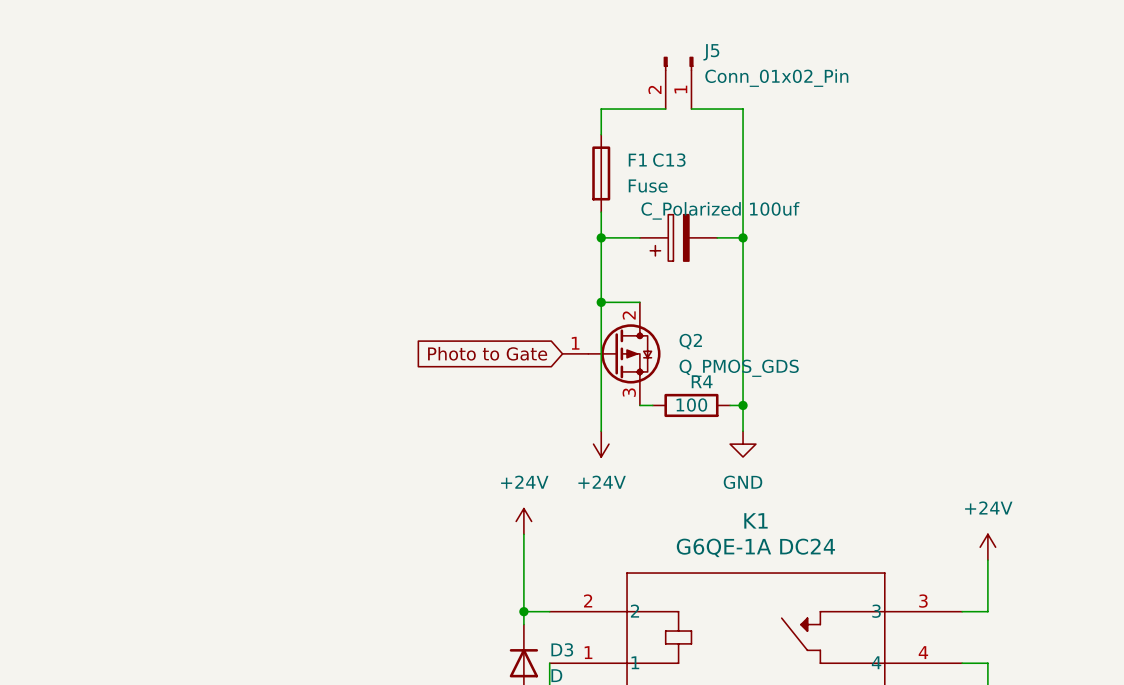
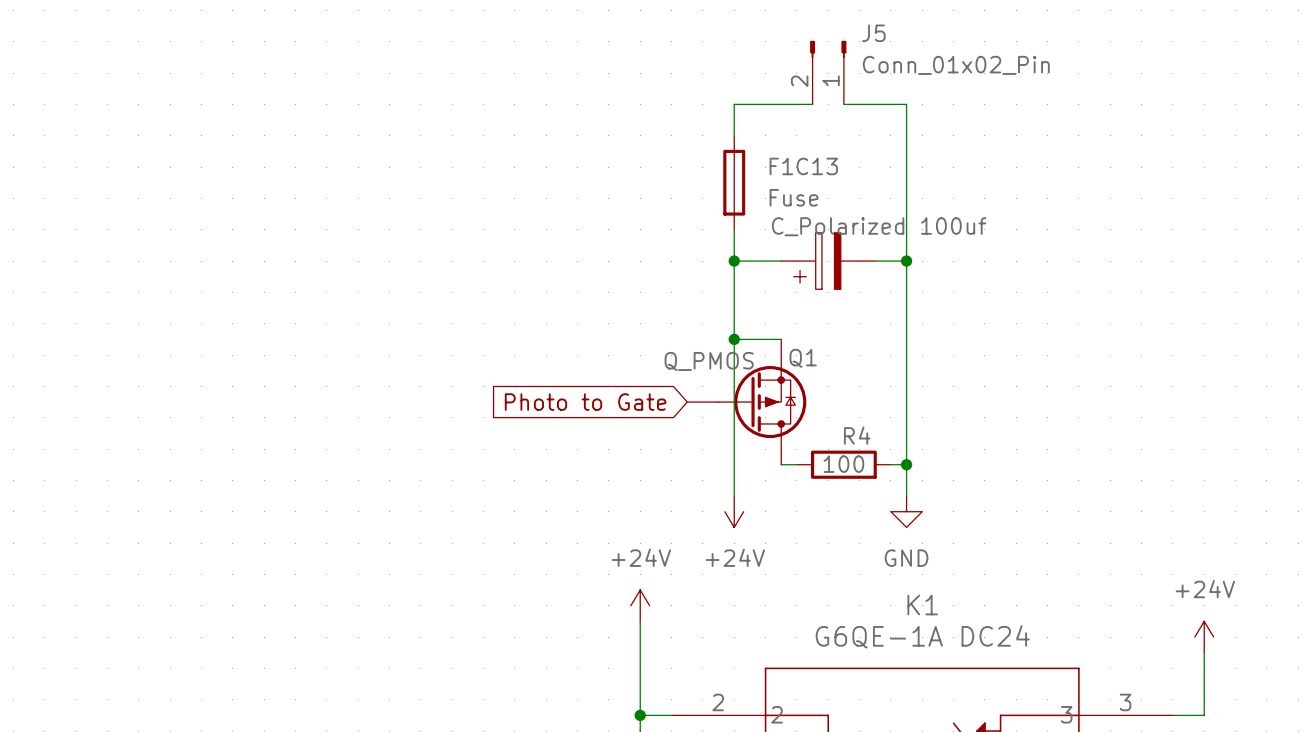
Q2: Q_PMOS_GDS (611, 353) -> none
Q1: none -> Q_PMOS (746, 402)

